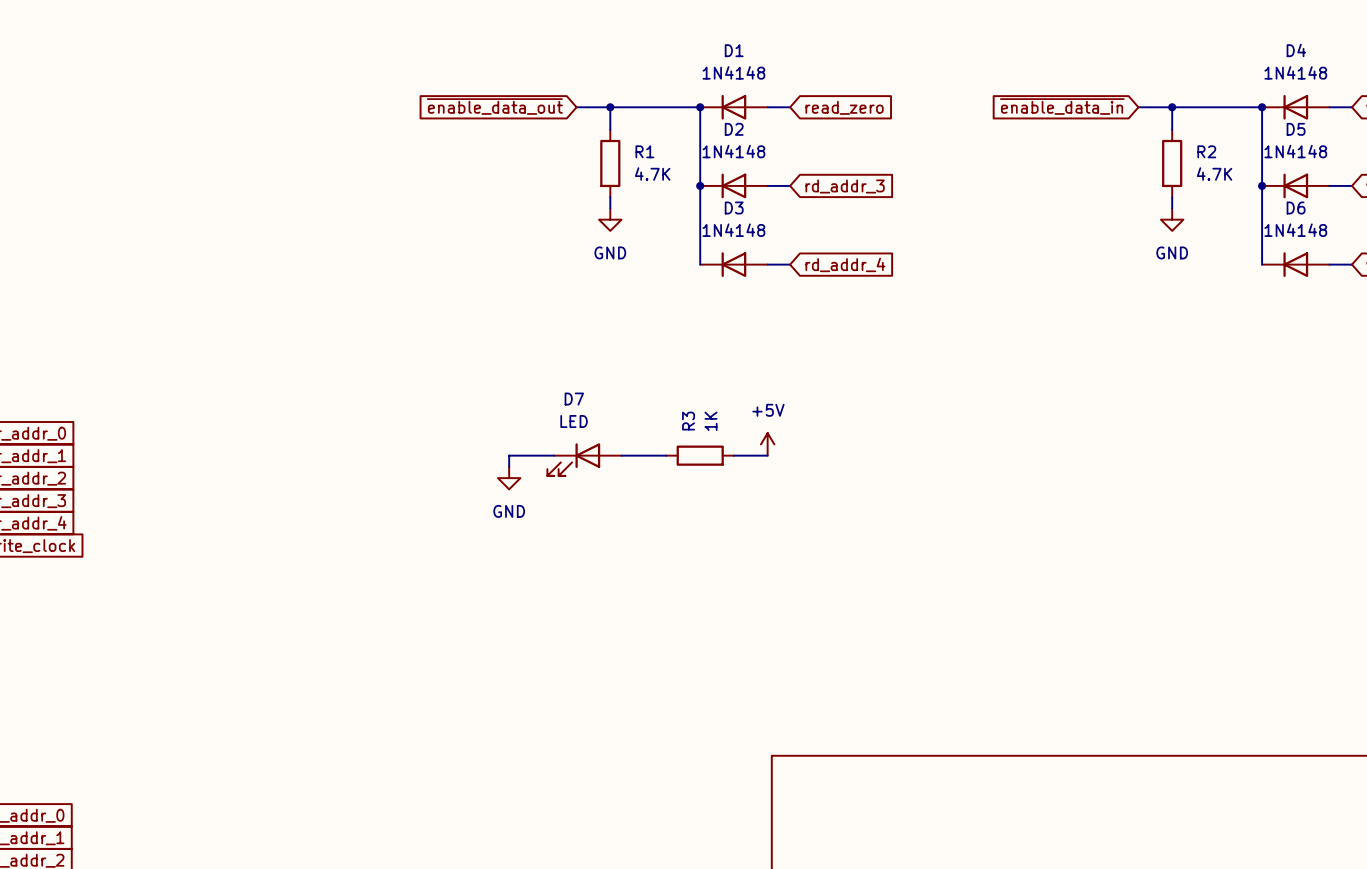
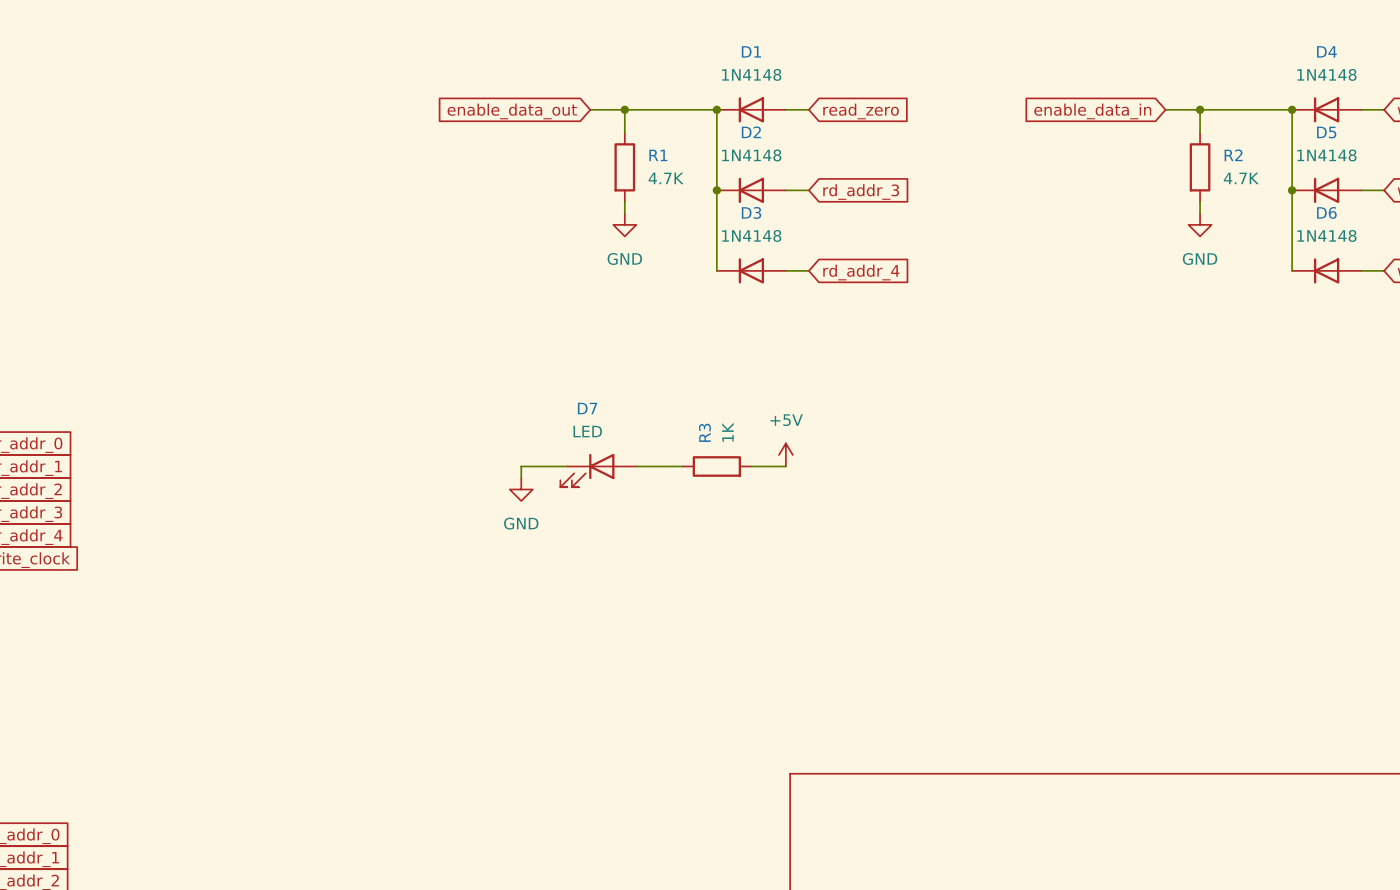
global label: ~{enable_data_out} (494, 106) -> enable_data_out (512, 111)
global label: ~{enable_data_in} (1062, 106) -> enable_data_in (1092, 111)

